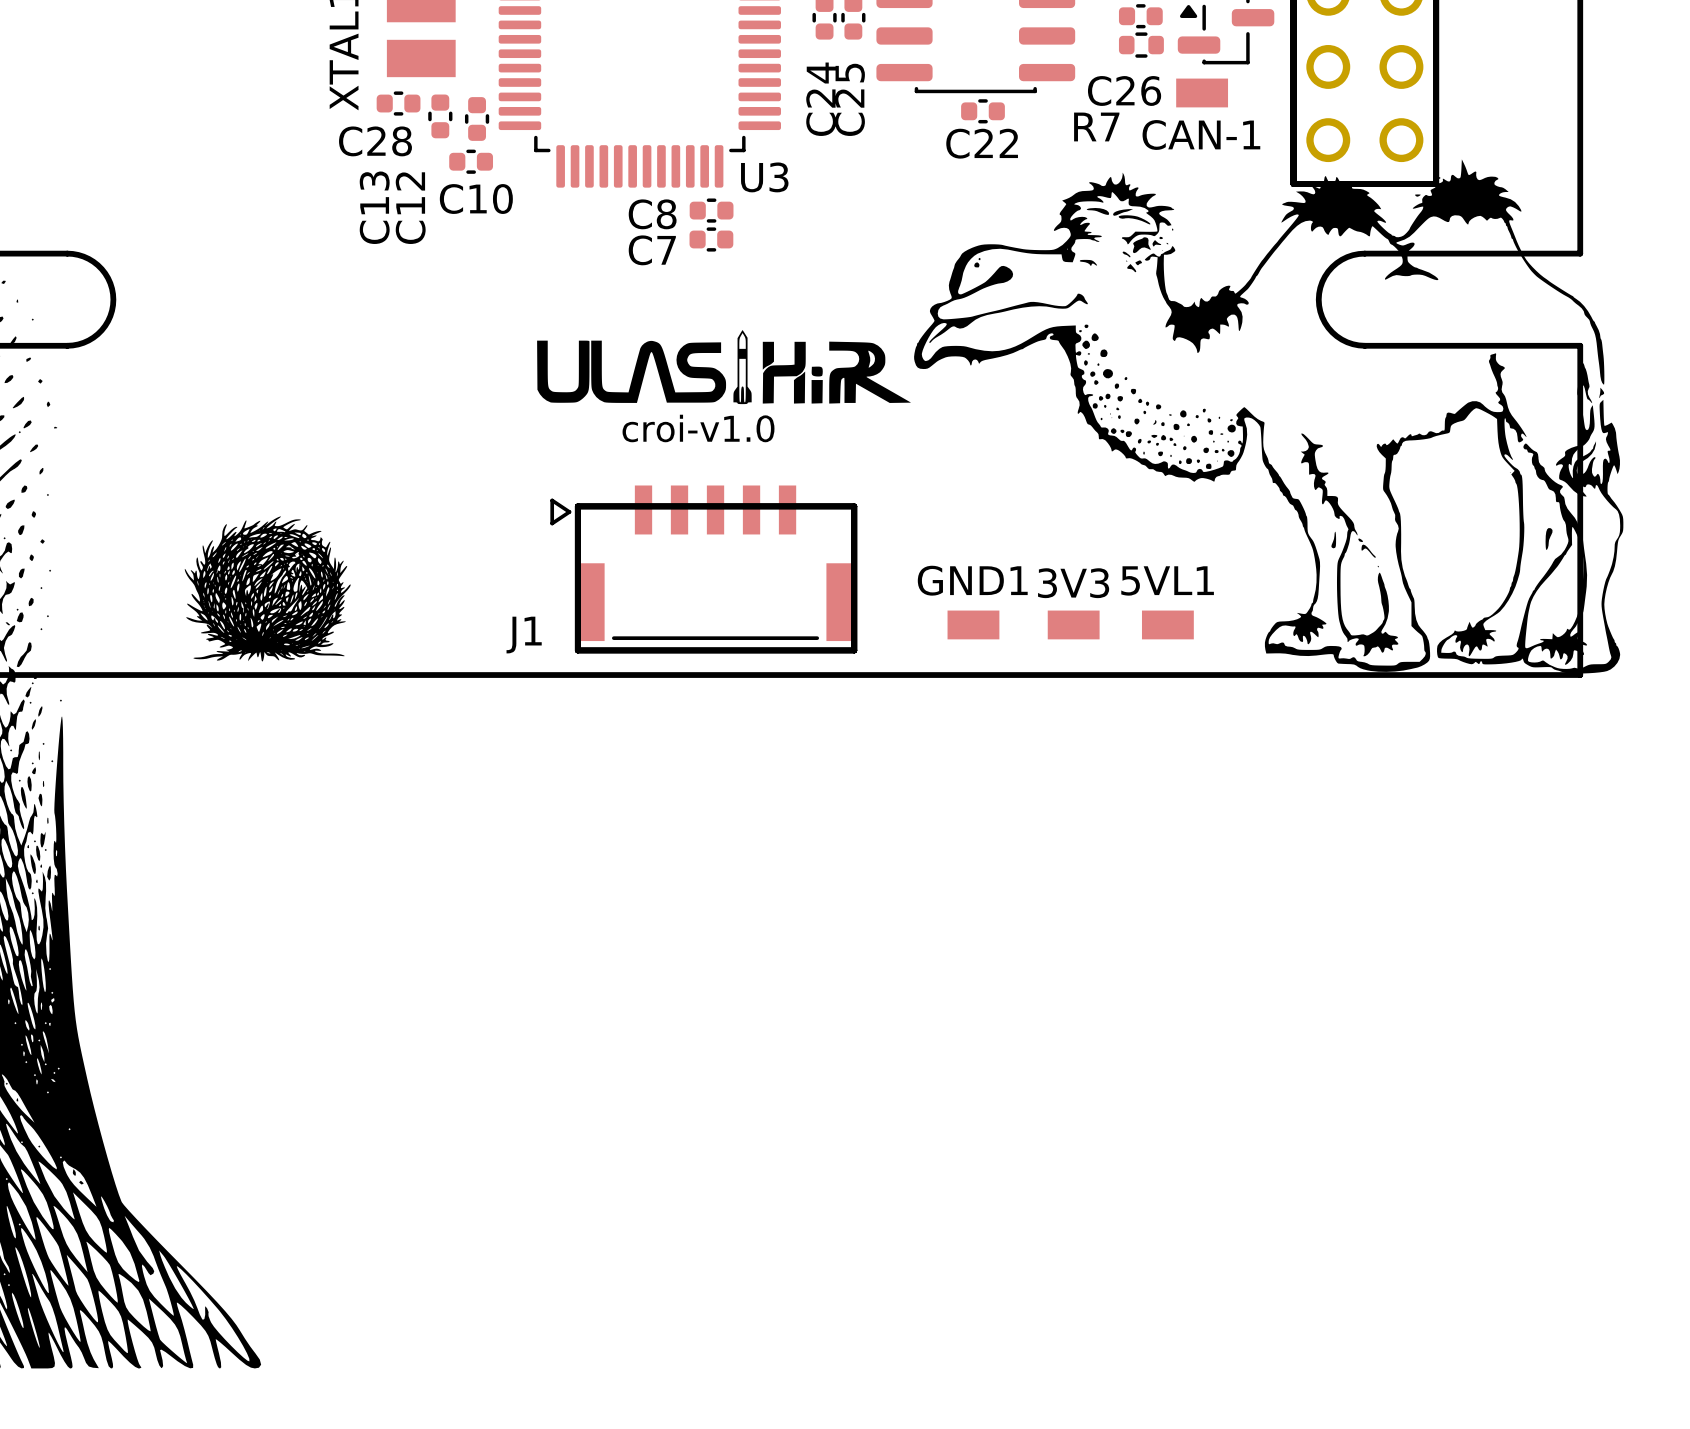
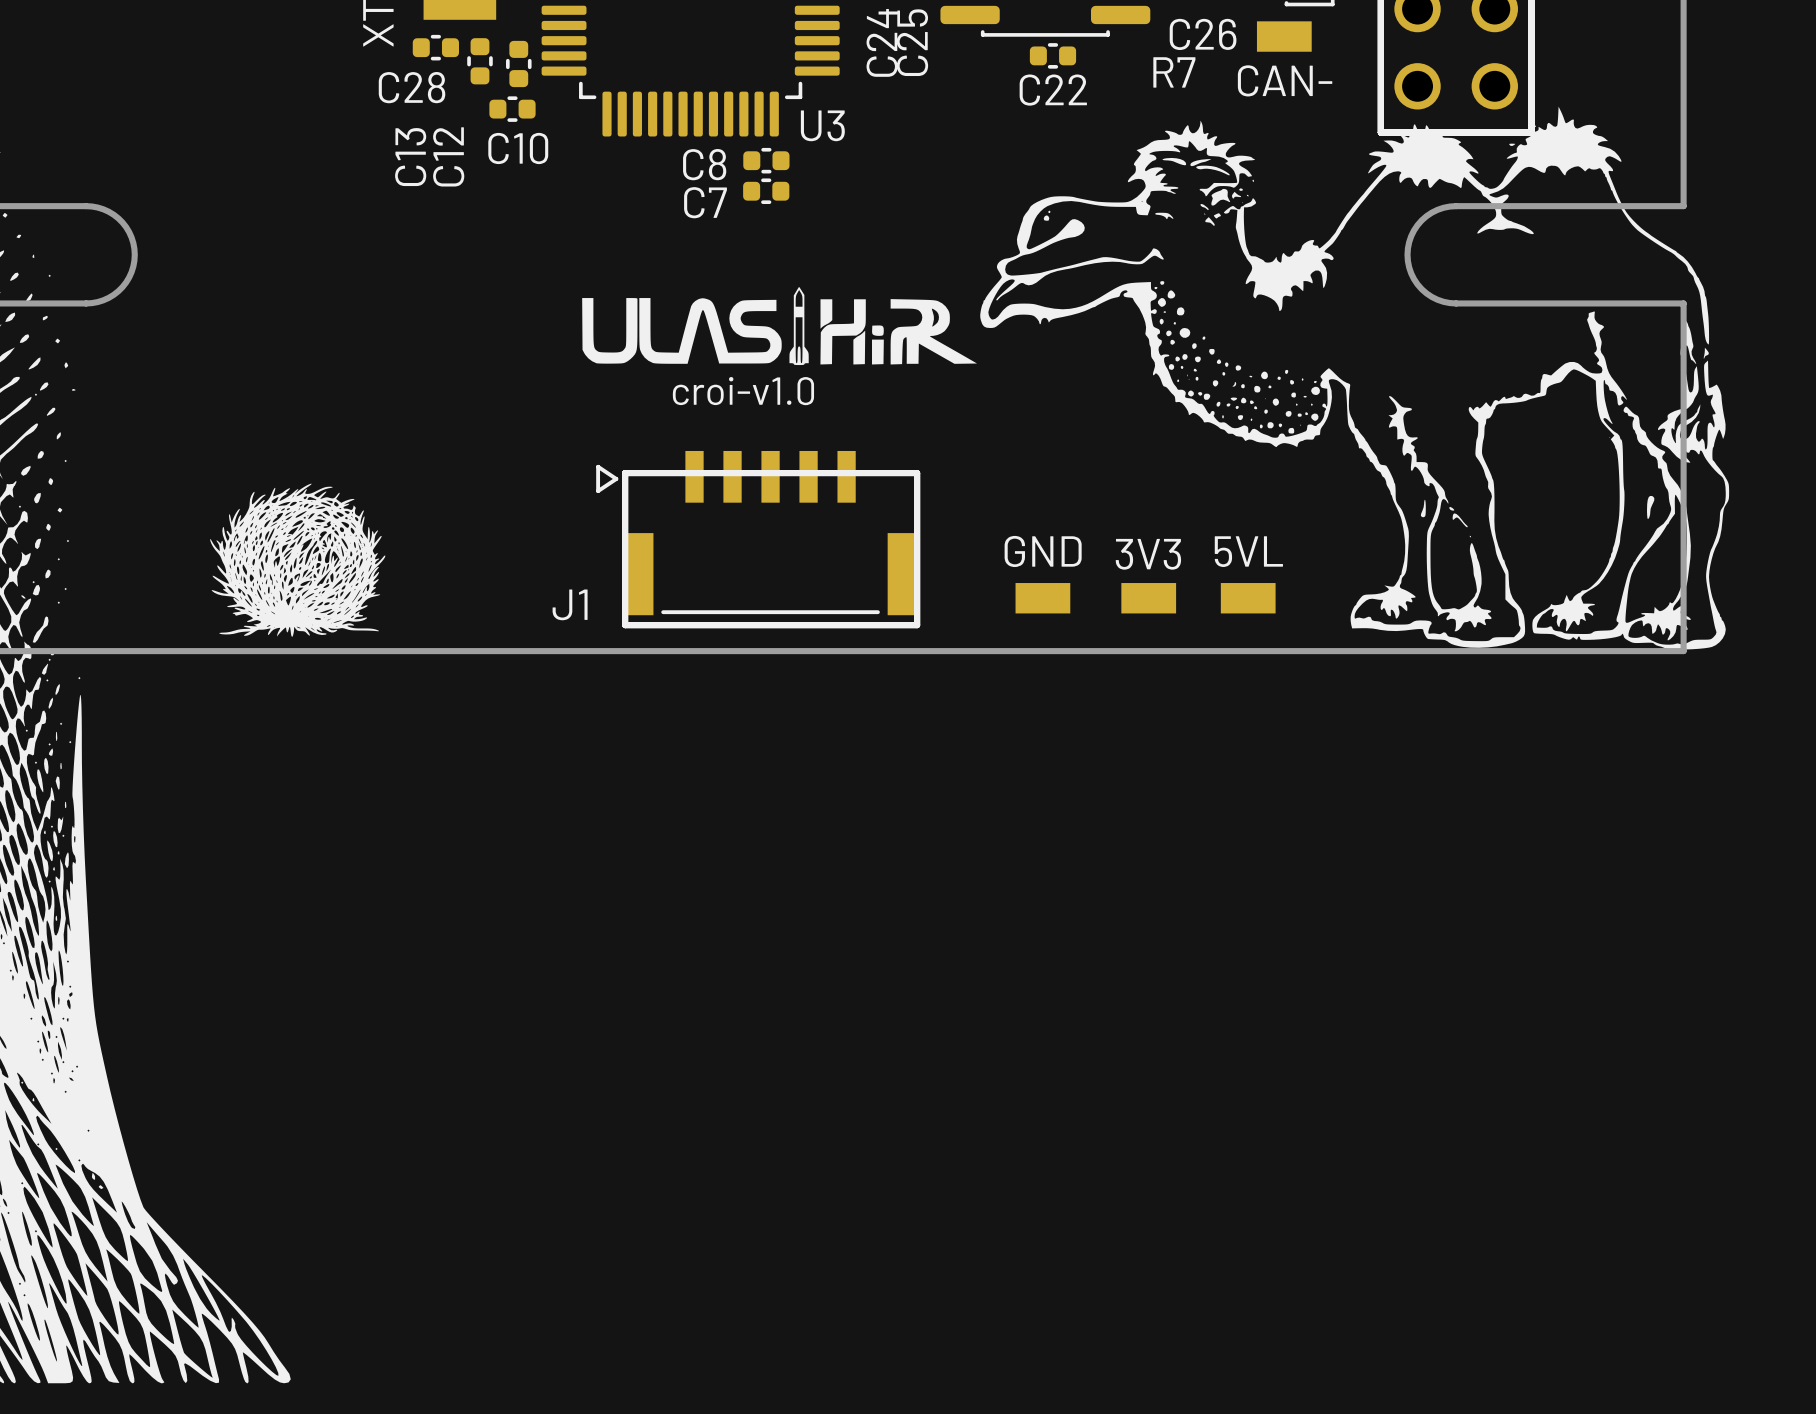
CAN-1 name: CAN-1 (1201, 134) -> CAN- (1285, 80)
GND1 name: GND1 (972, 580) -> GND (1043, 551)
5VL1 name: 5VL1 (1167, 580) -> 5VL (1248, 551)

